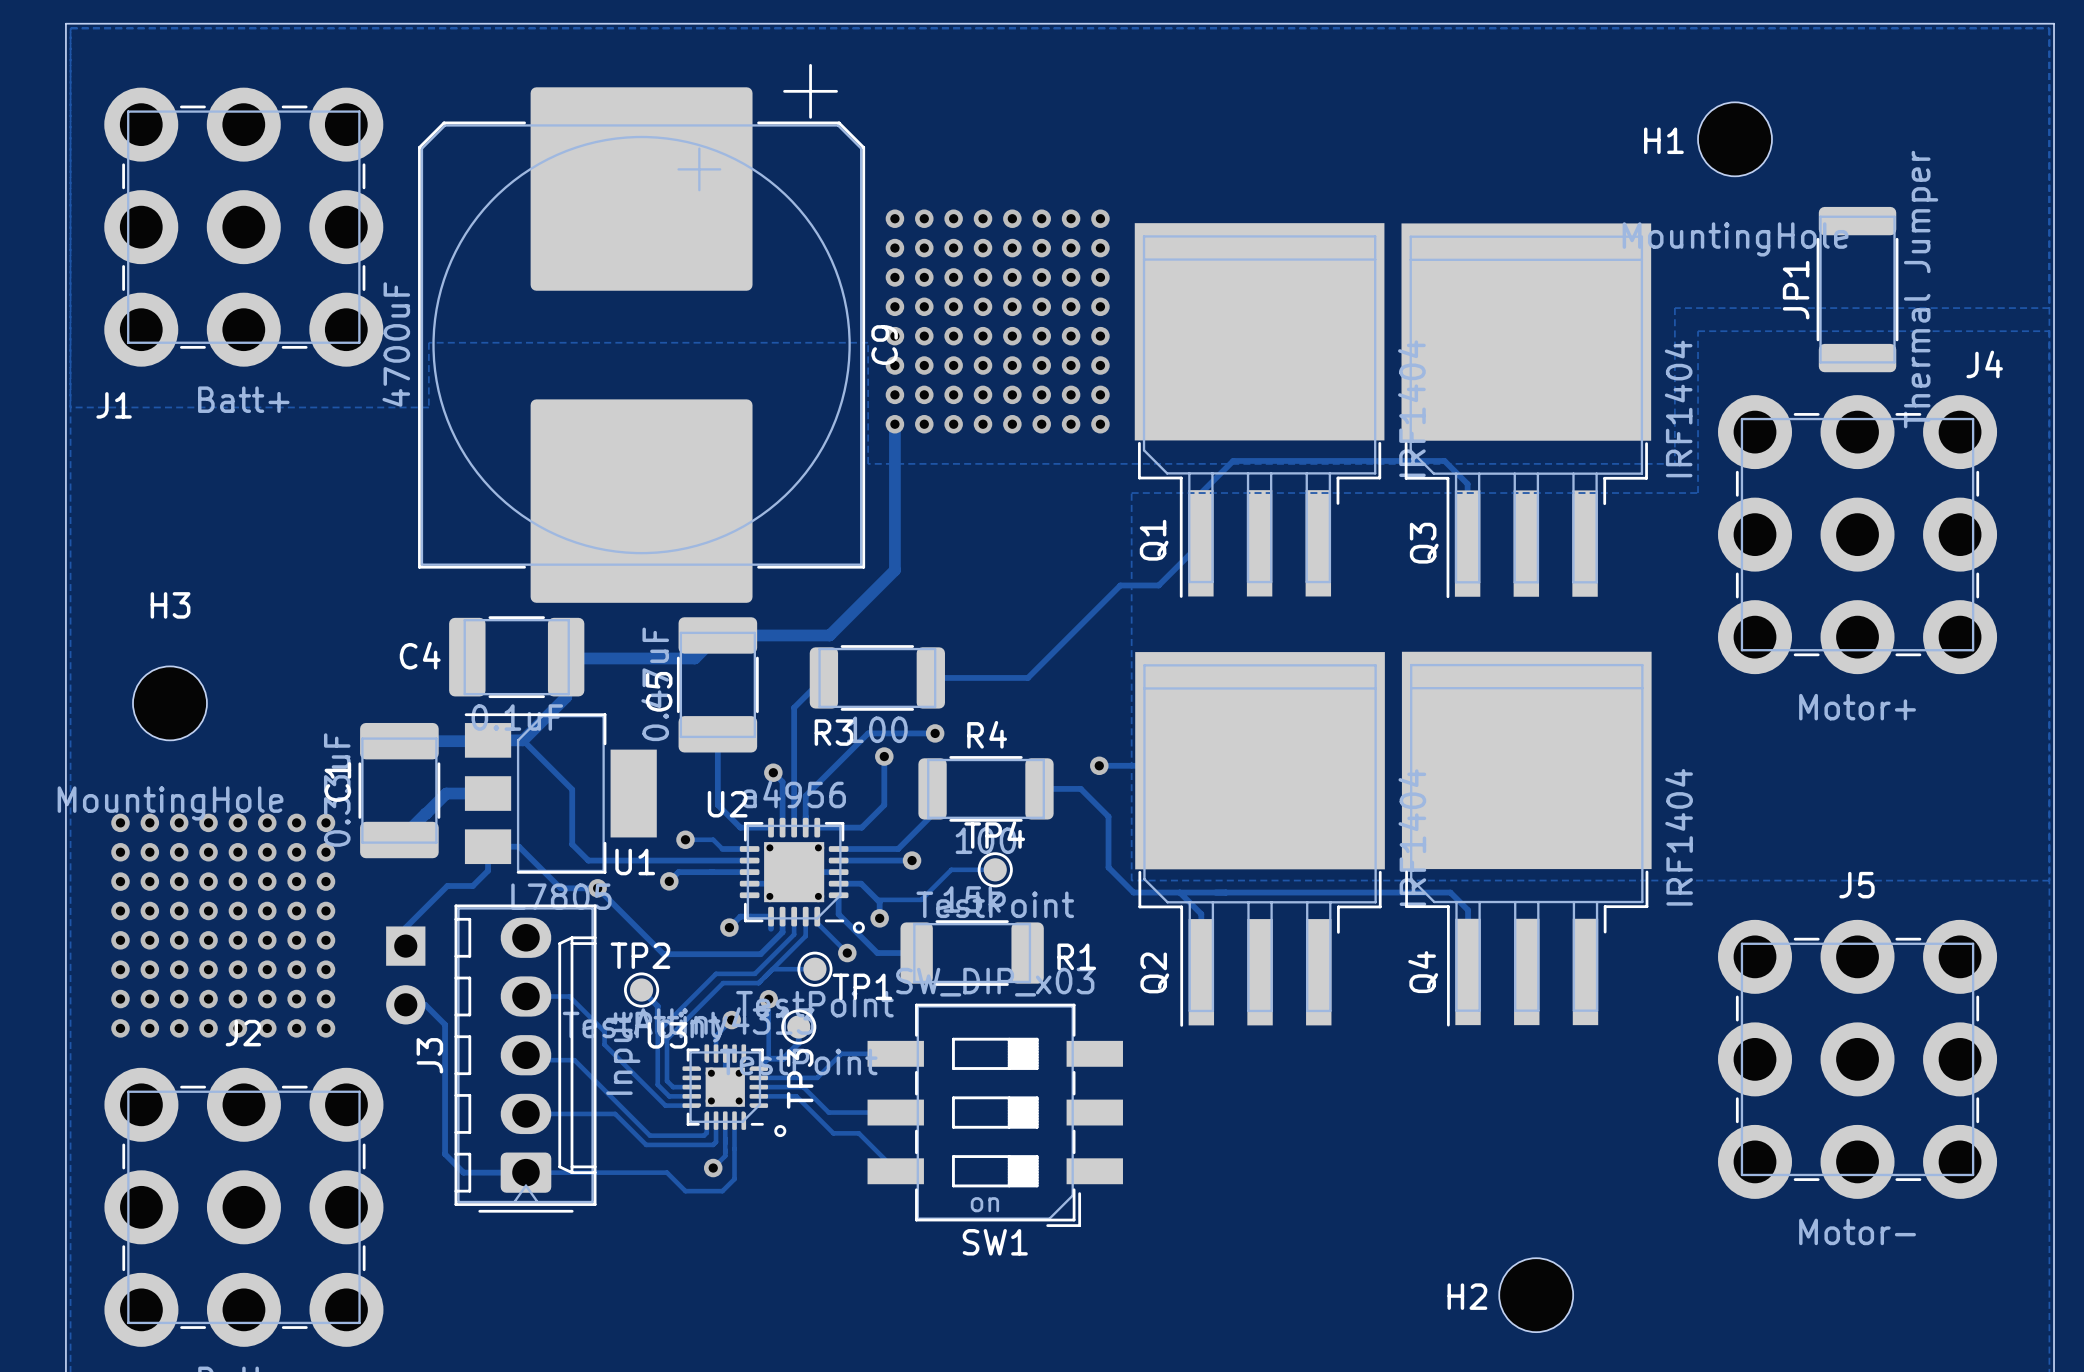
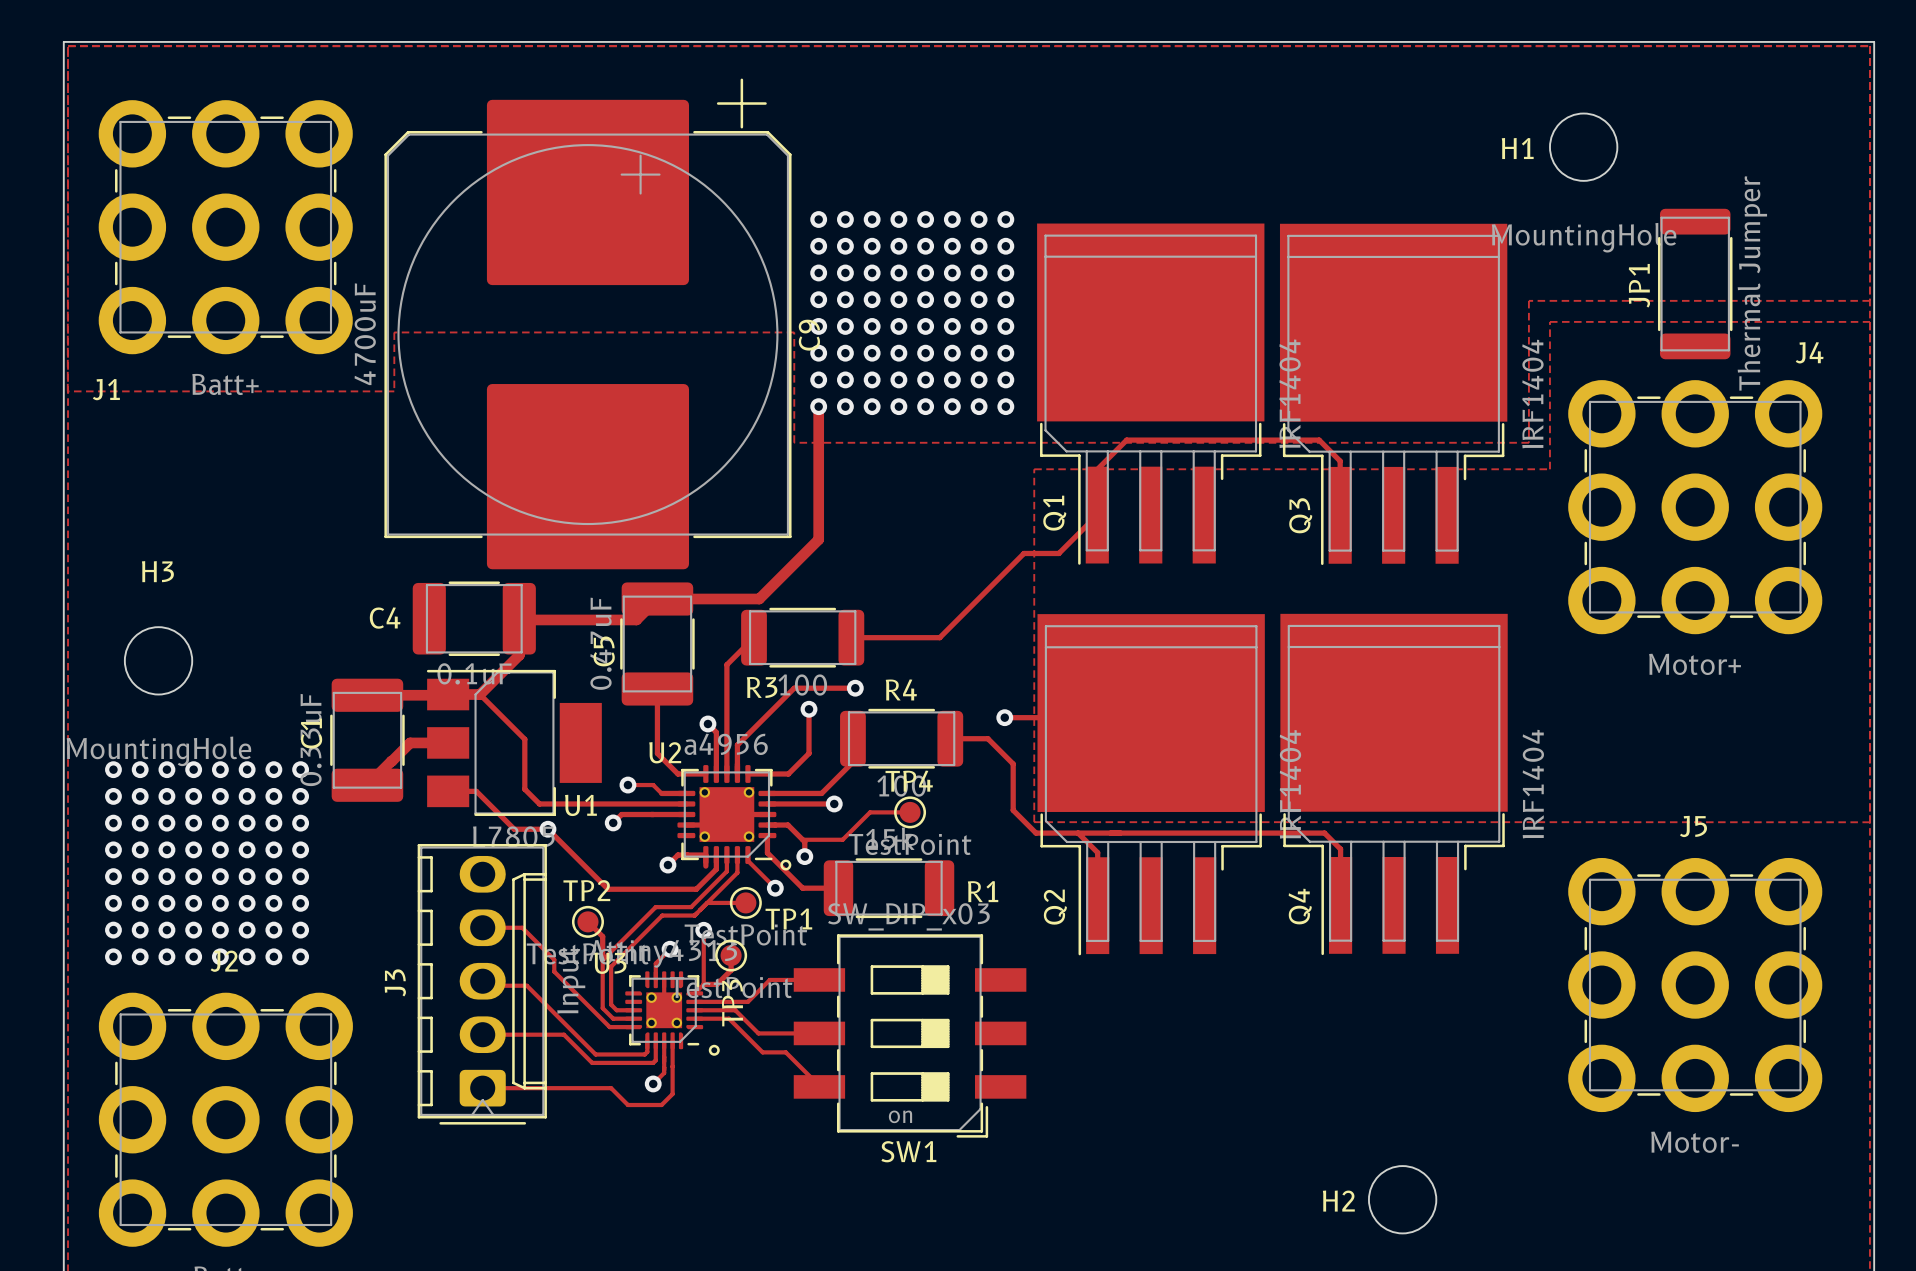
track: (488, 846) (488, 870) (472, 886) (447, 886) (405, 927) (405, 946) -> none
part: (405, 975) -> none
track: (405, 1004) (425, 1004) (445, 1024) (445, 1154) (463, 1172) (525, 1172) -> none

